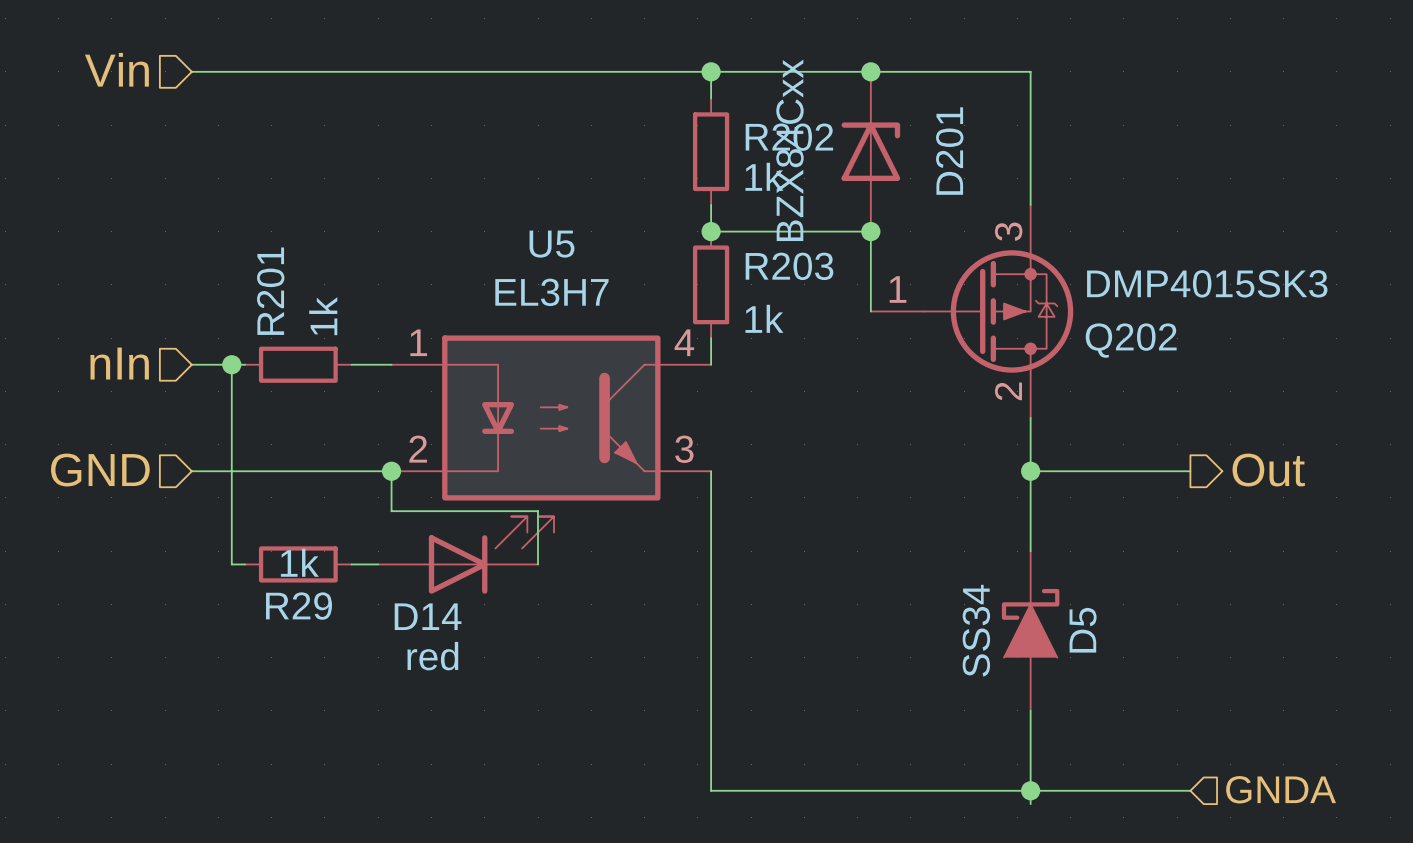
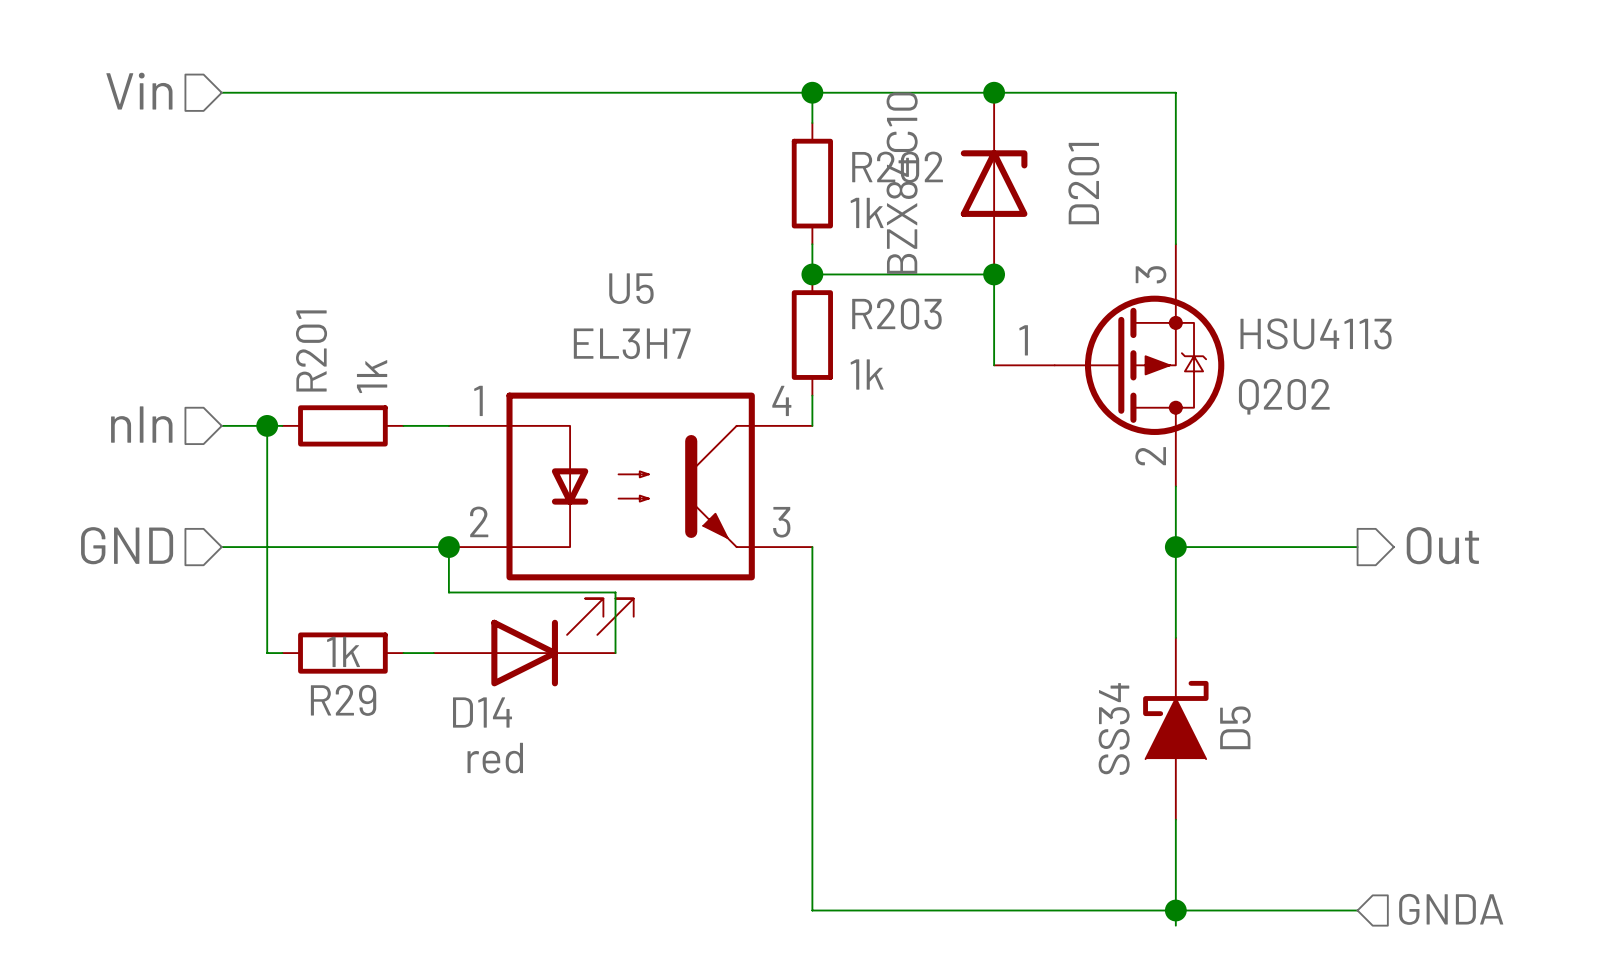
D201 value: BZX84Cxx (789, 150) -> BZX84C10 (902, 183)
Q202 value: DMP4015SK3 (1207, 283) -> HSU4113 (1316, 333)

